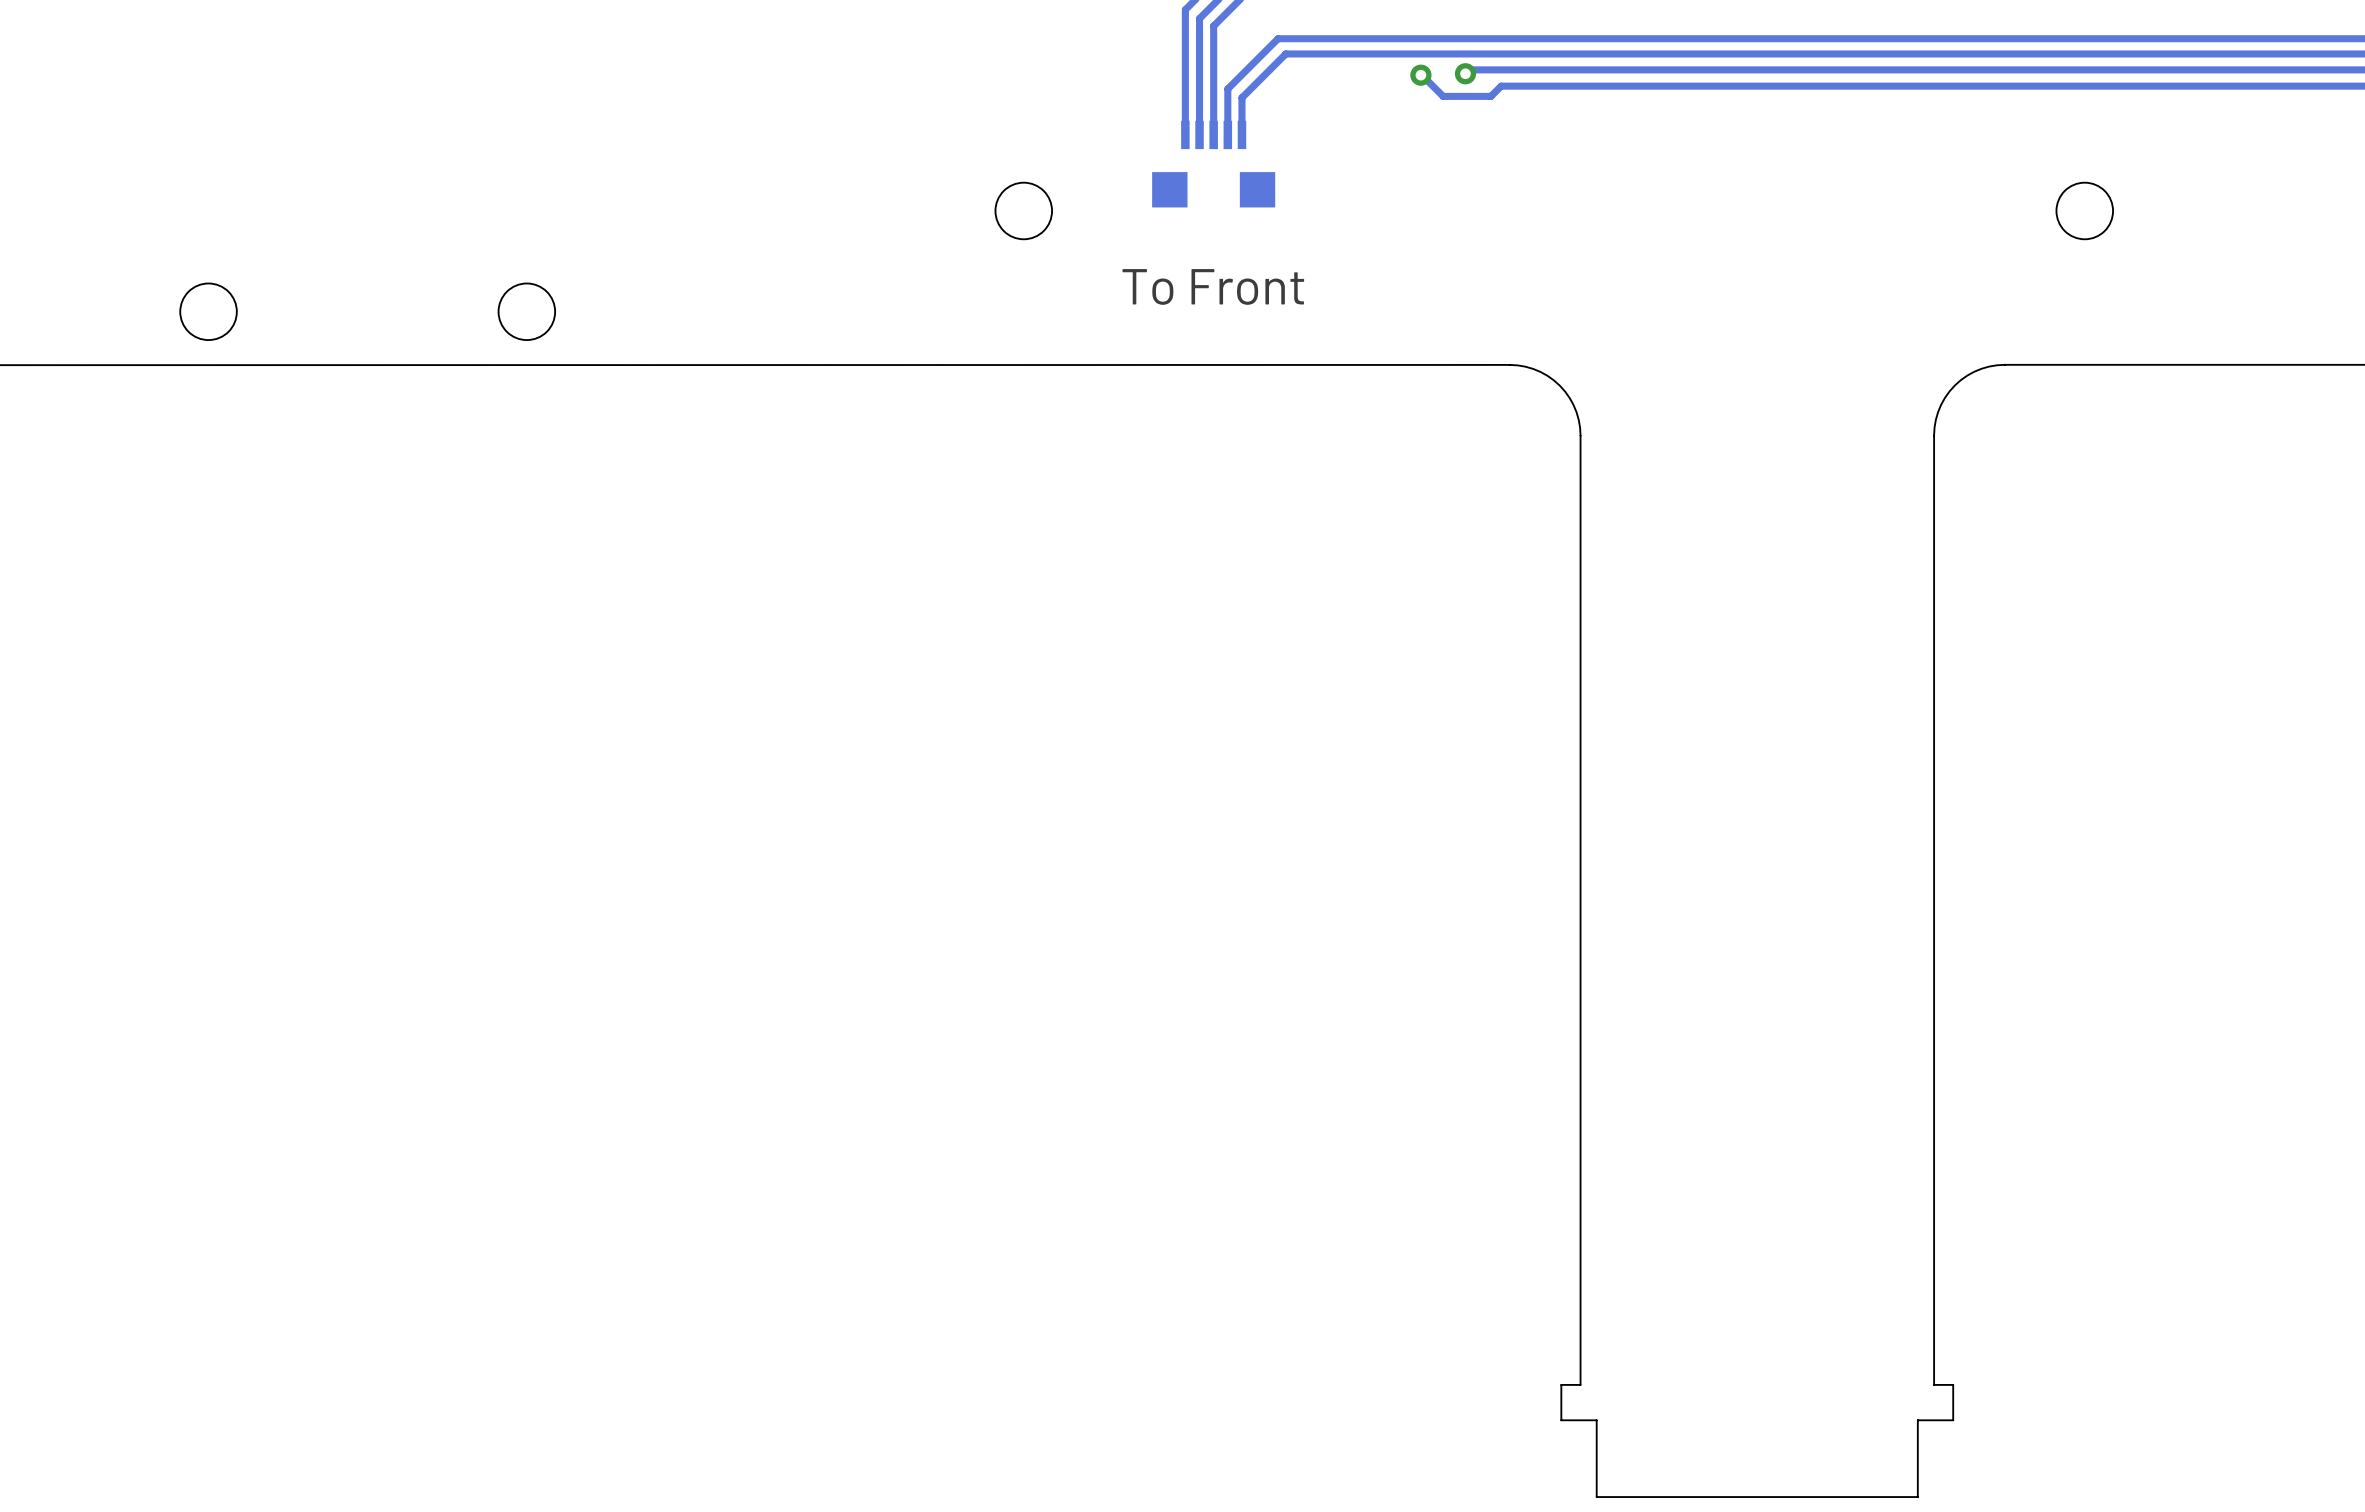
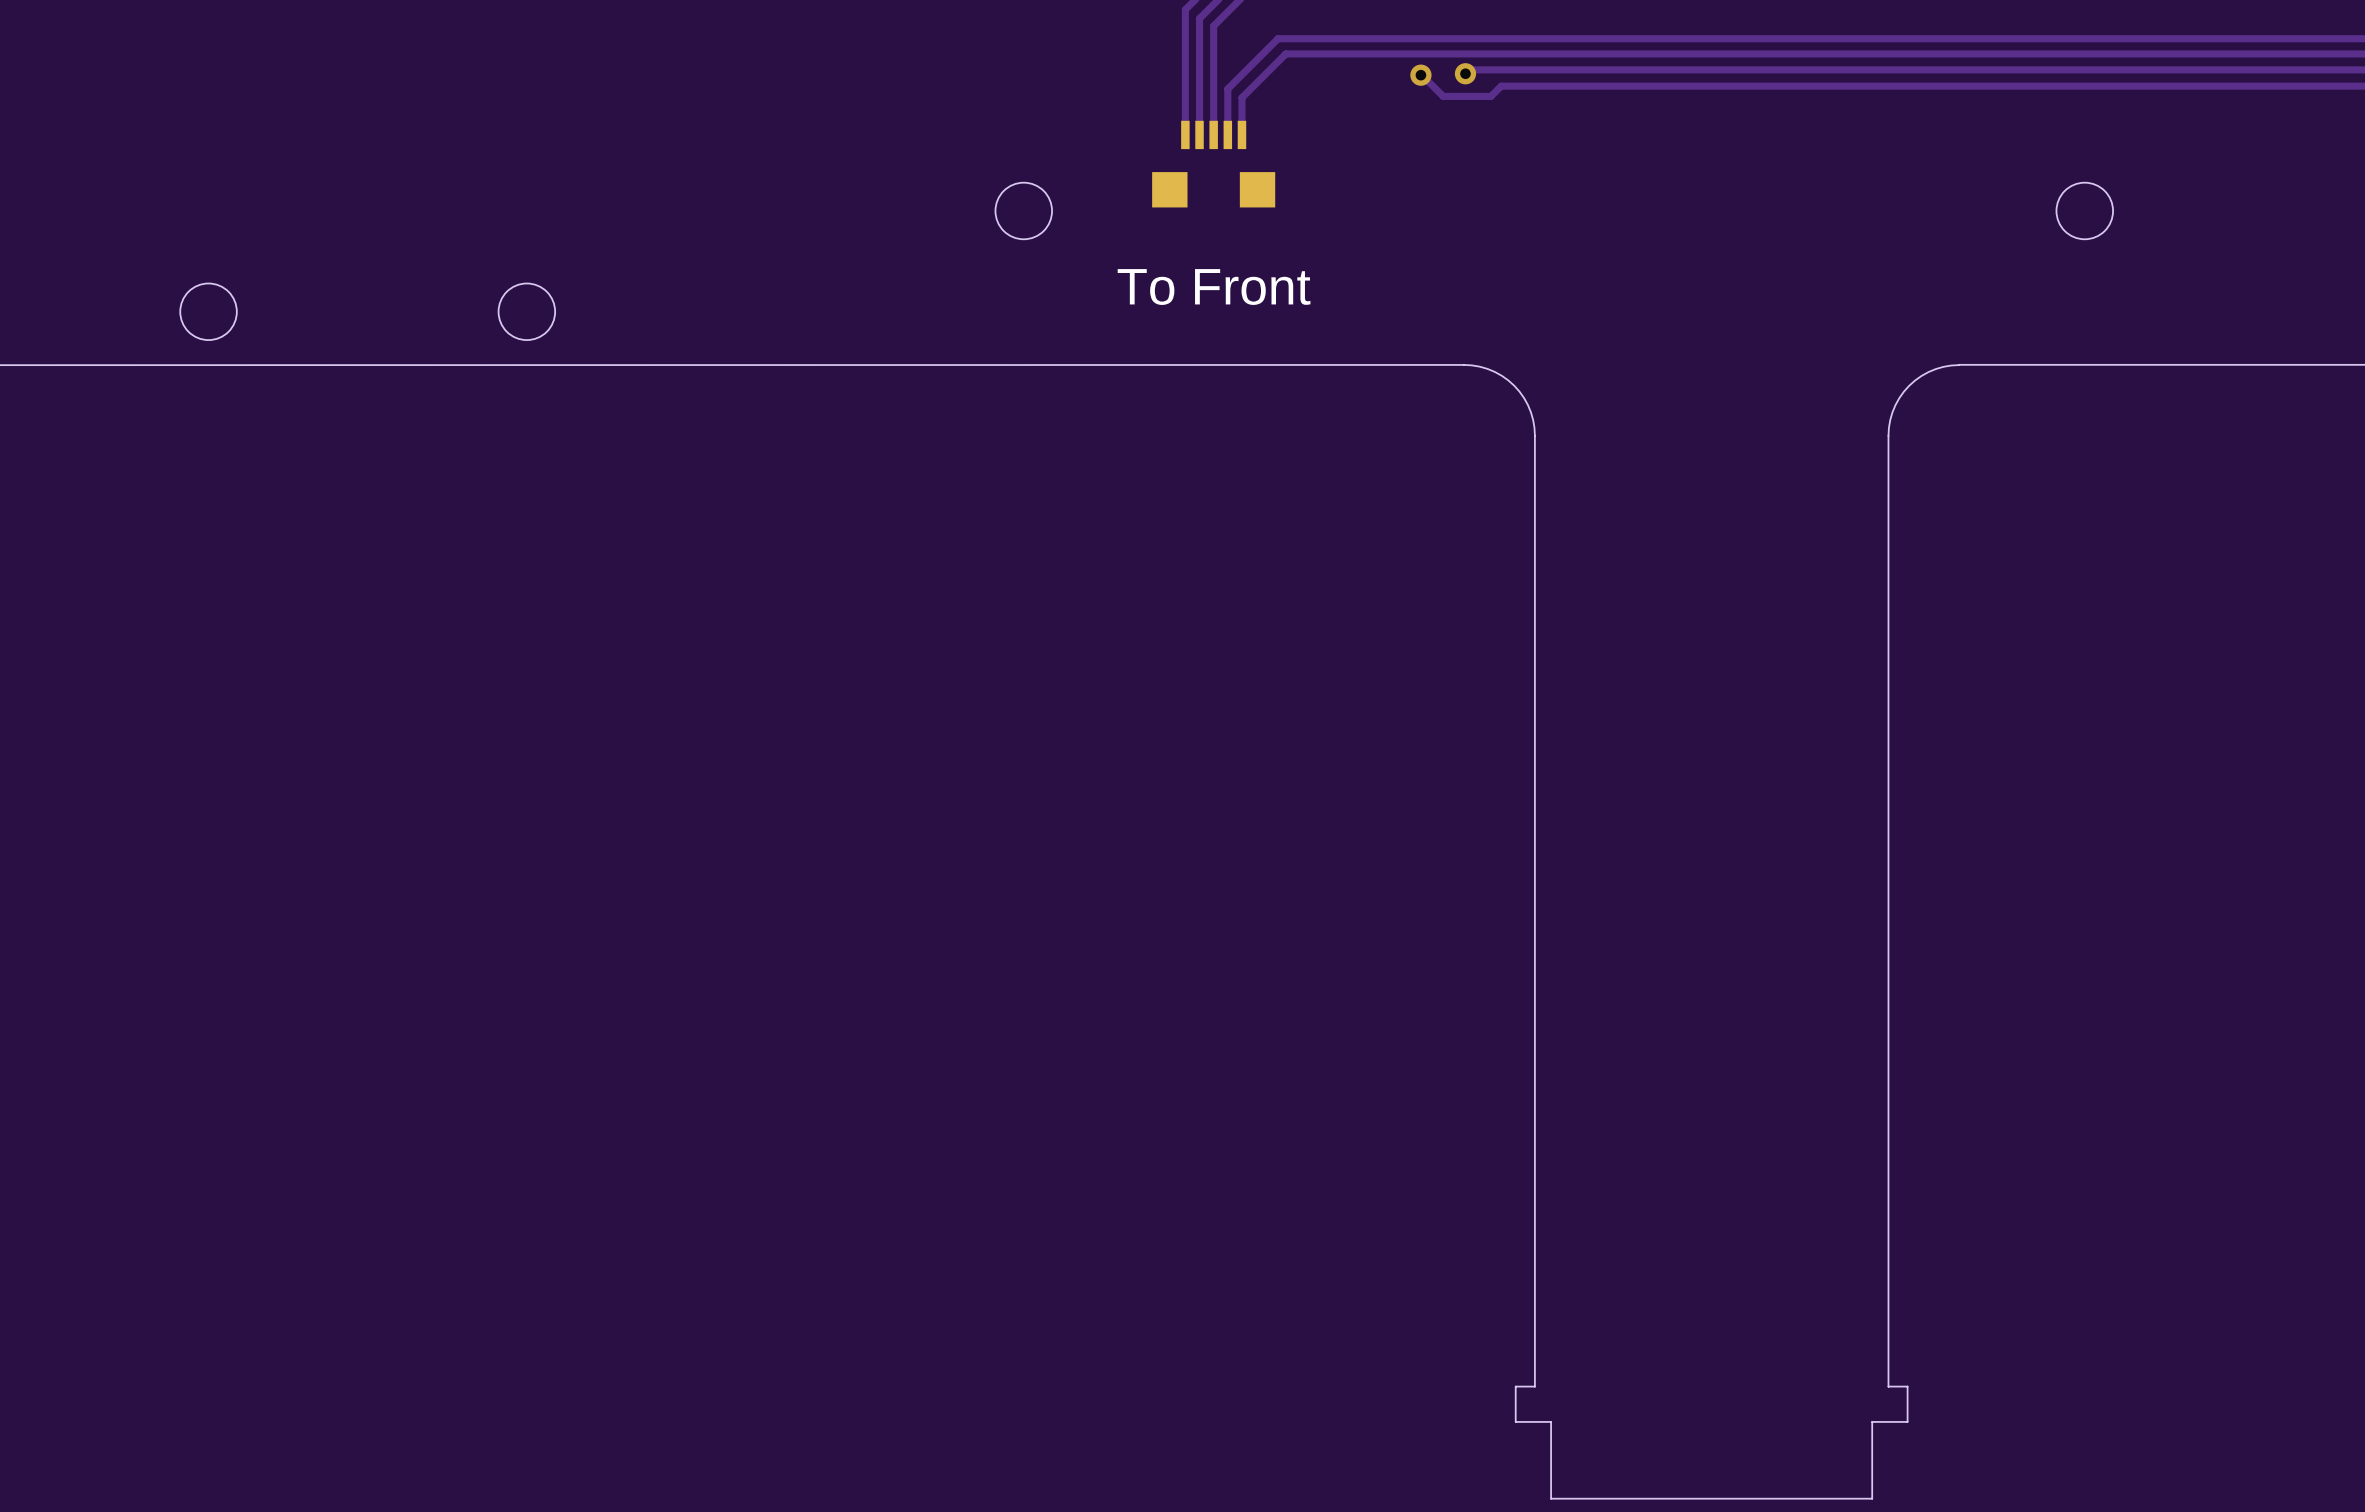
board edge: (1464, 364) (1517, 365) (1540, 371) (1553, 380) (1565, 391) (1573, 404) (1580, 427) (1580, 1385) -> (1464, 364) (1487, 368) (1508, 380) (1524, 398) (1530, 412) (1534, 427) (1534, 1386)
board edge: (2004, 364) (1981, 368) (1960, 380) (1949, 391) (1941, 404) (1934, 427) (1934, 1385) -> (2004, 364) (1959, 364)
board edge: none -> (1959, 365) (1935, 369) (1921, 375) (1909, 385) (1895, 405) (1888, 427) (1888, 1386)
part position: (1757, 1440) -> (1711, 1442)

